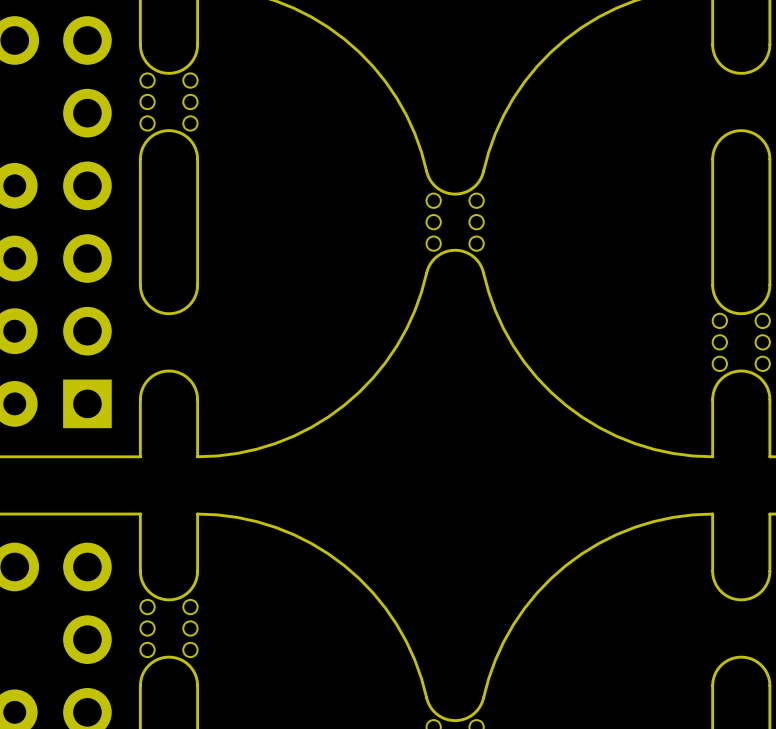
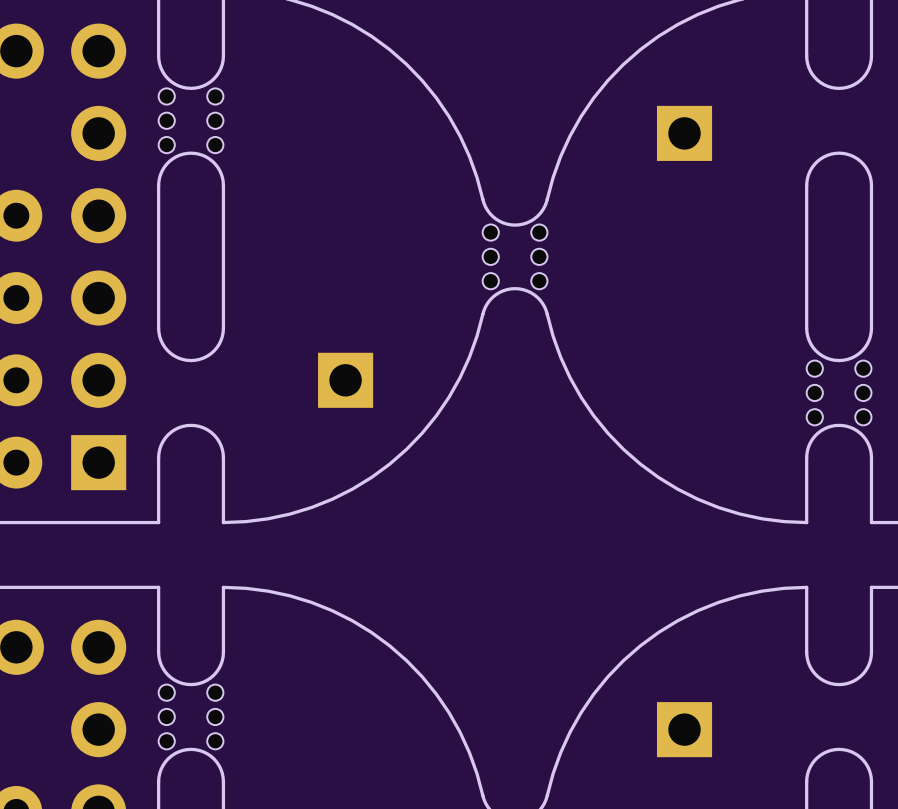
part: none -> (684, 133)
part: none -> (345, 380)
part: none -> (684, 729)

